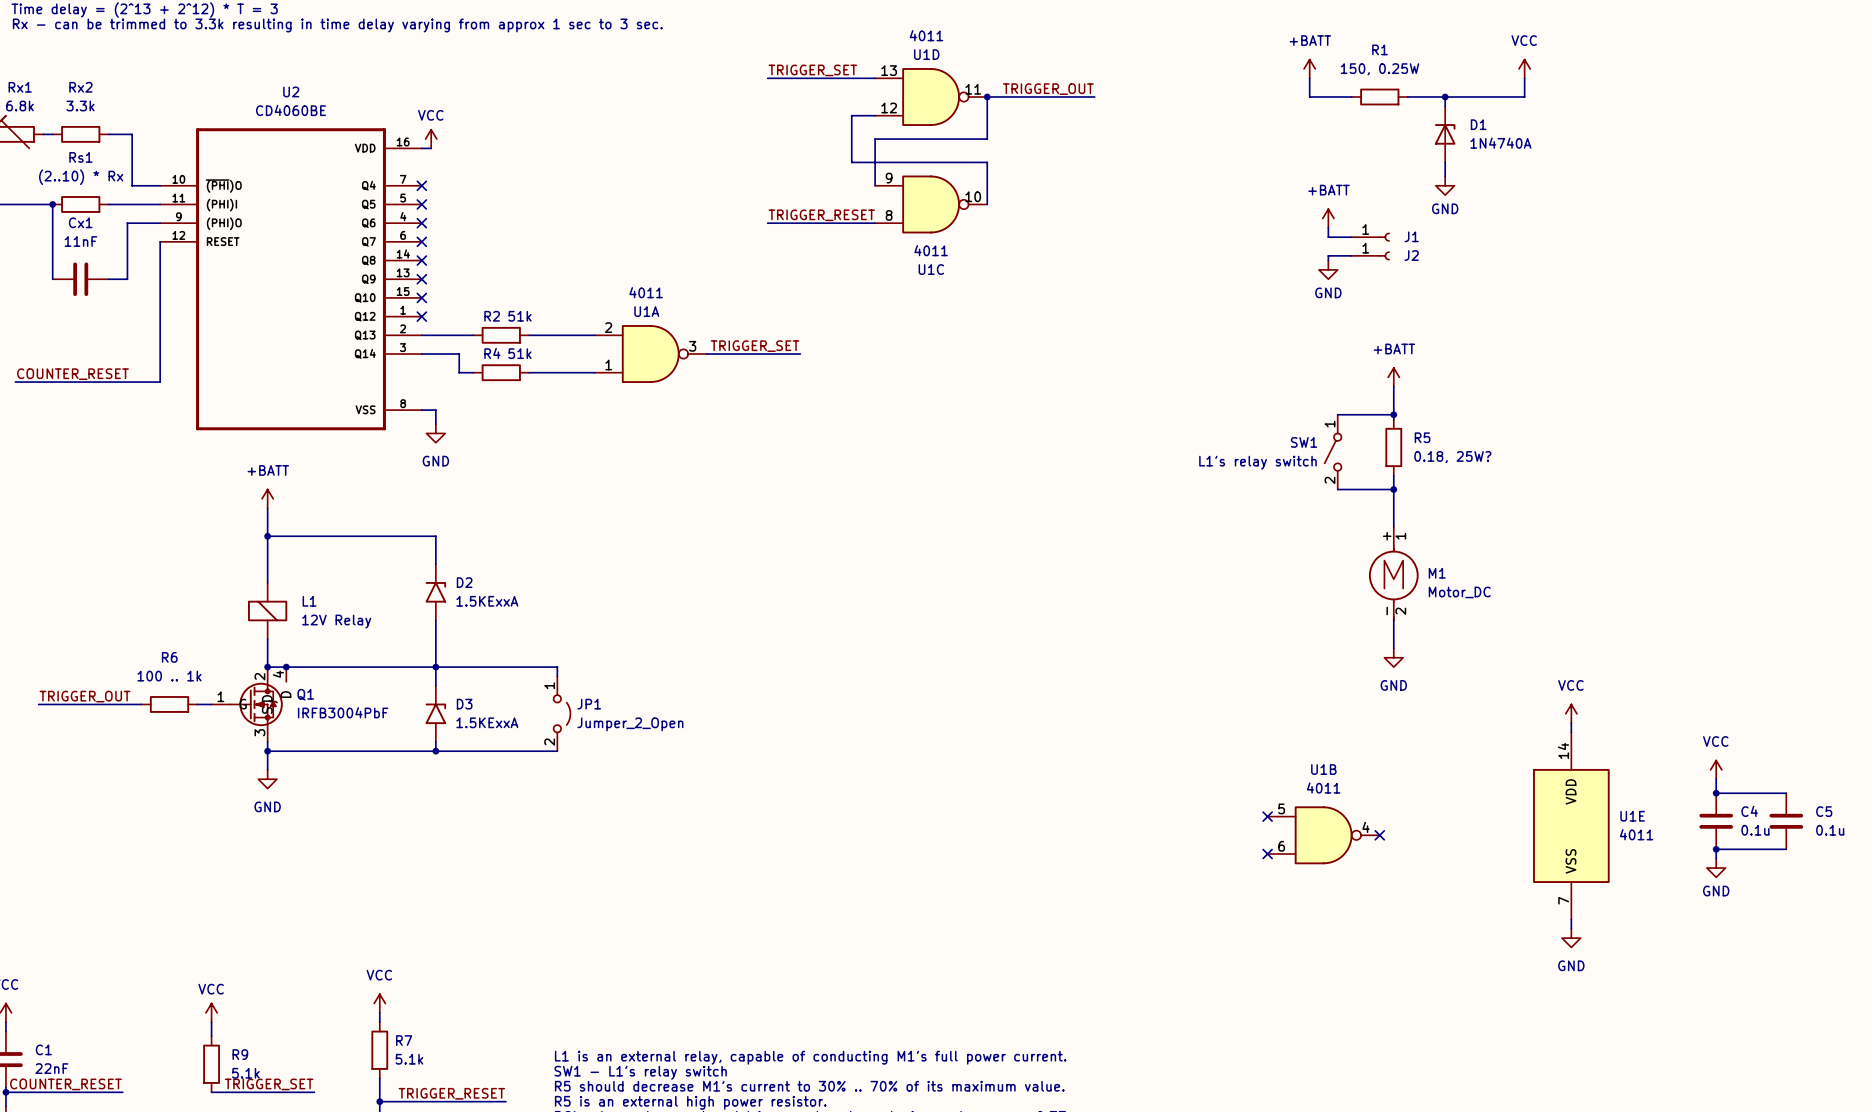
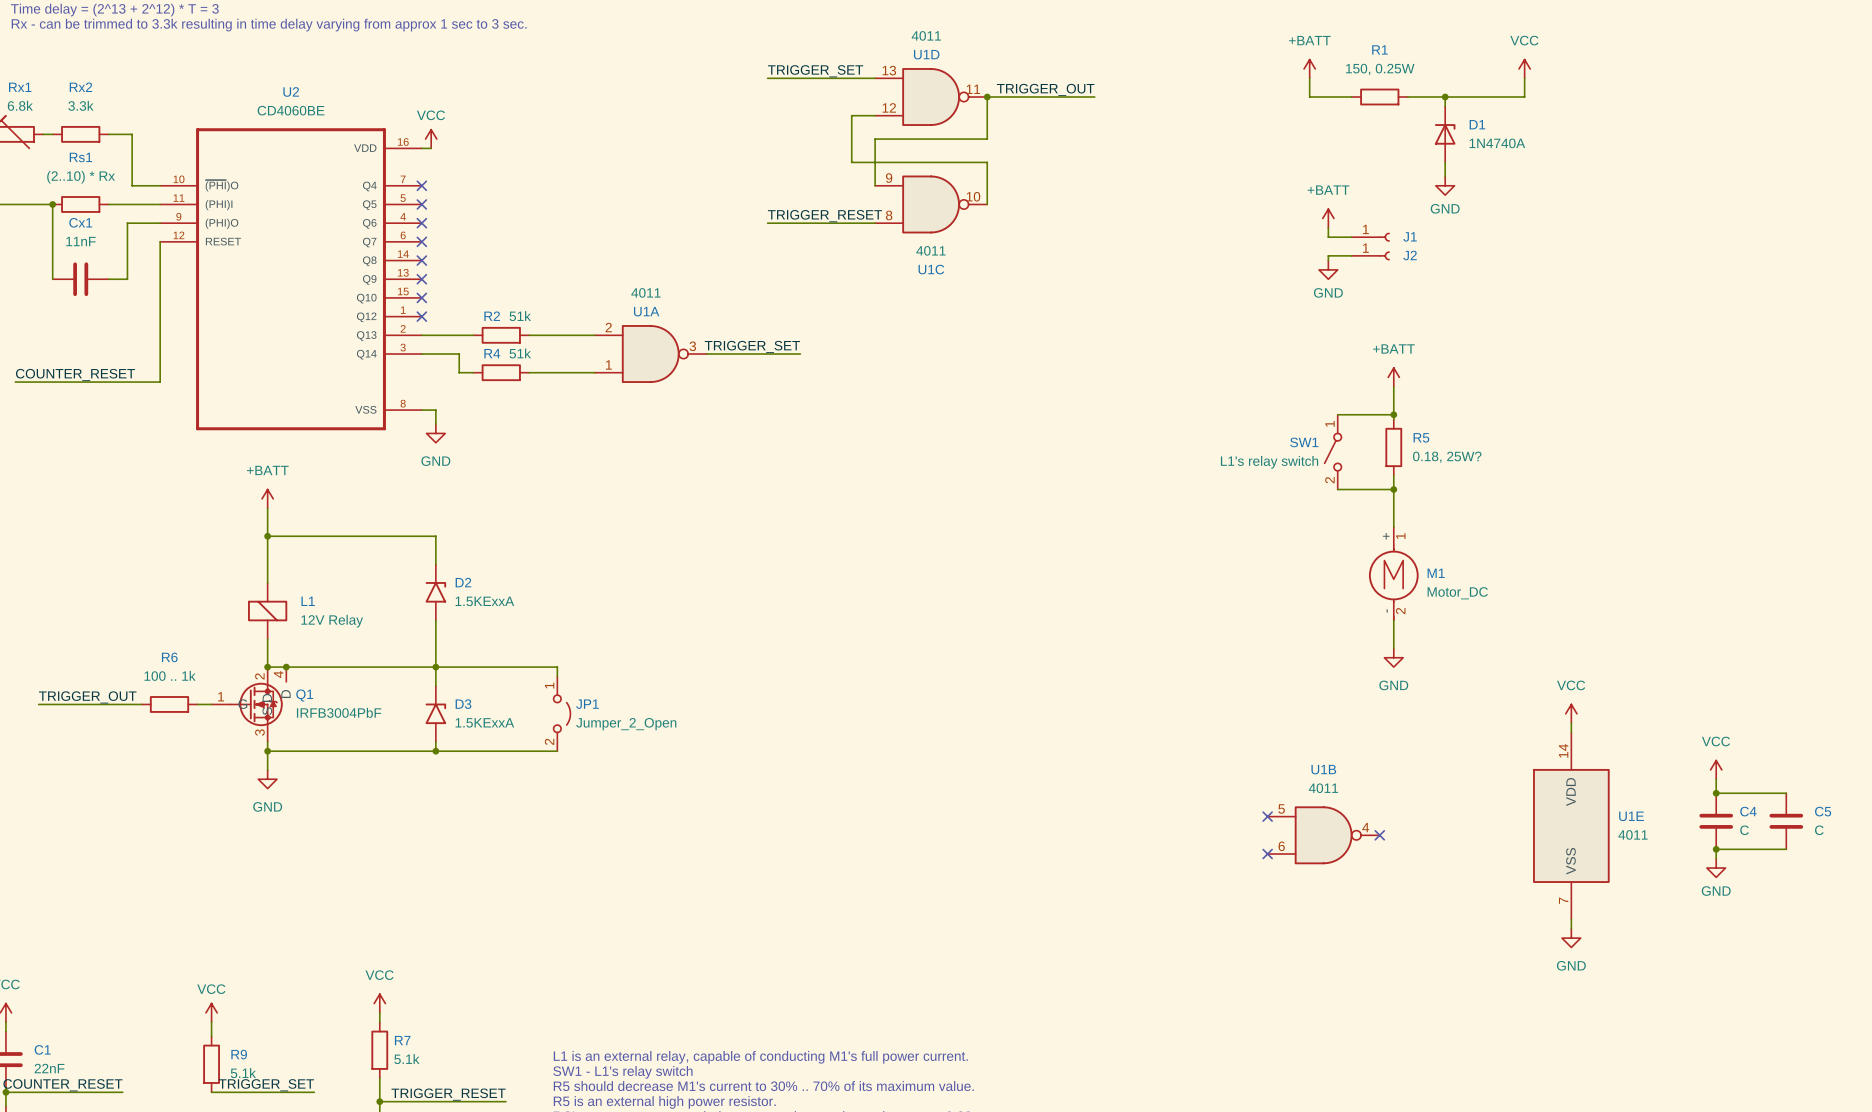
C4 value: 0.1u (1755, 830) -> C (1744, 830)
C5 value: 0.1u (1830, 830) -> C (1819, 830)

